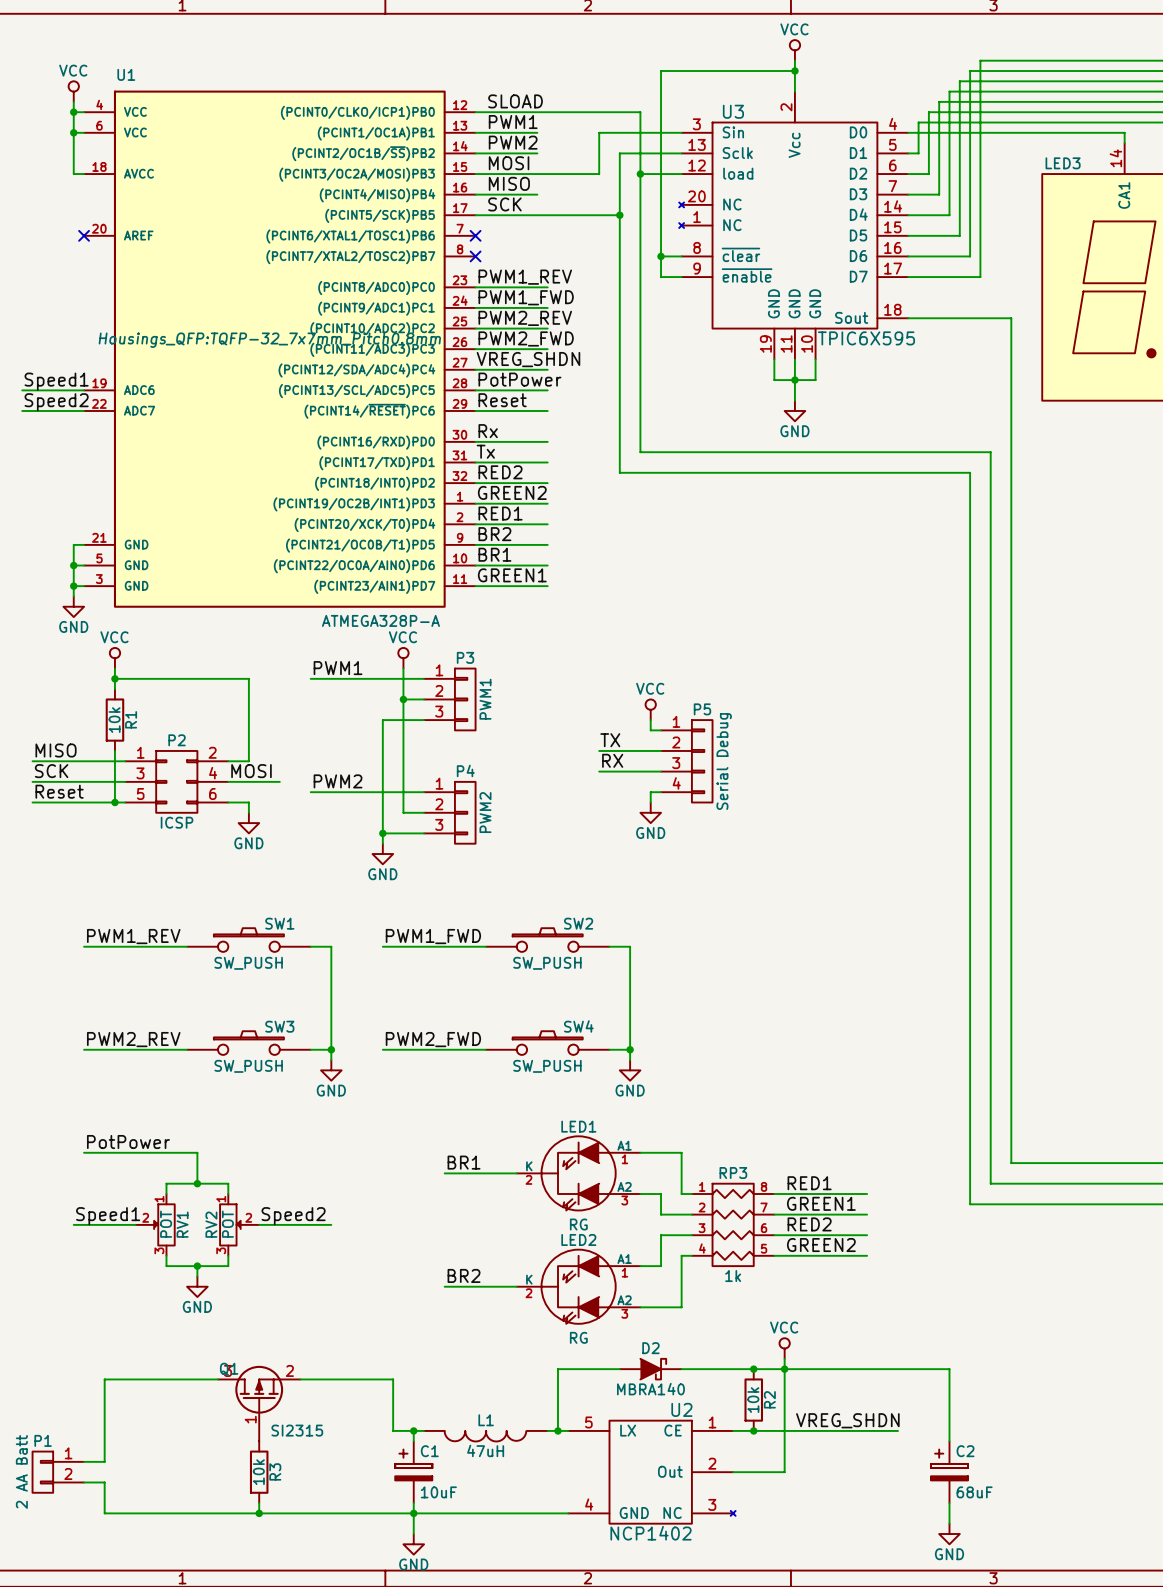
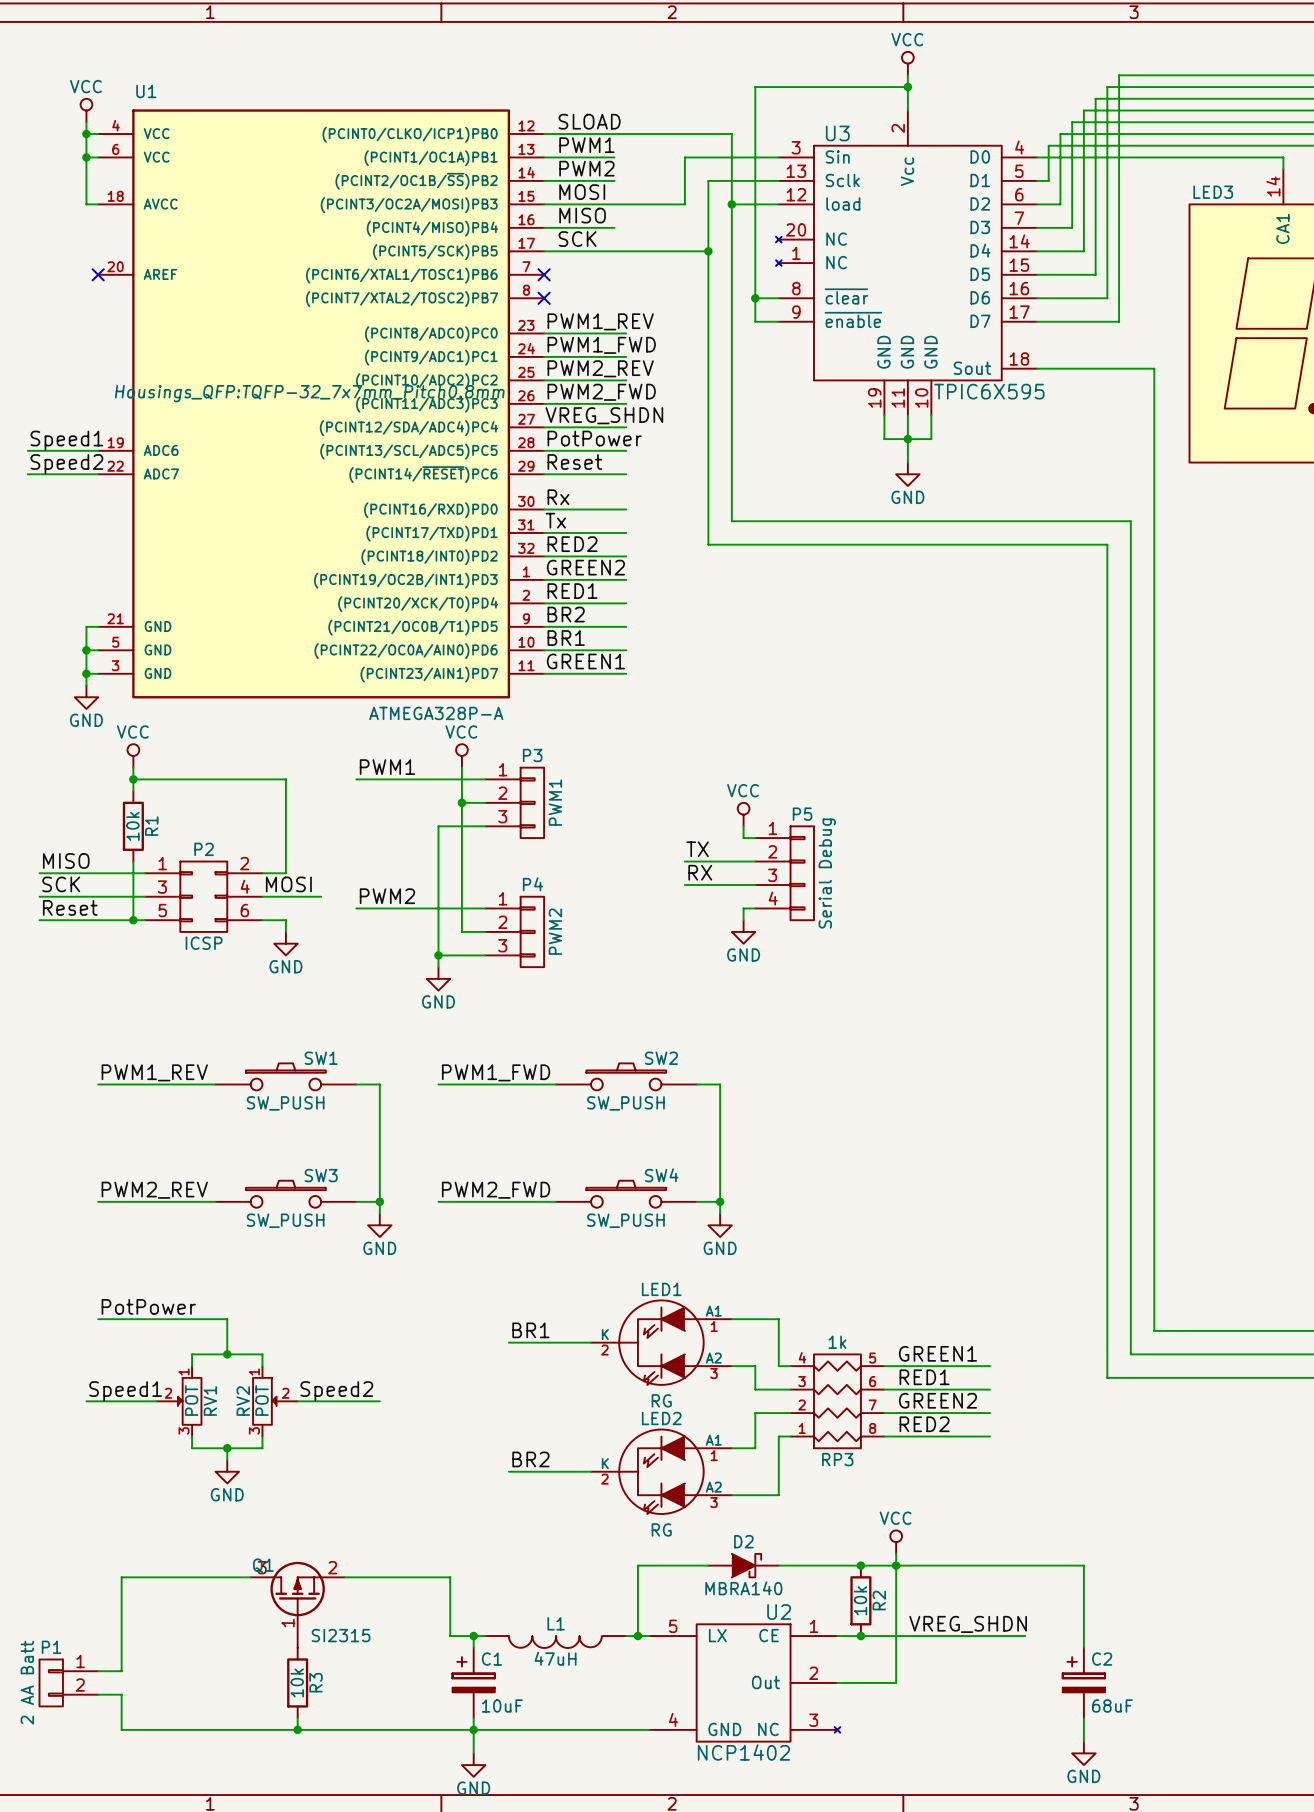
label: RED1 (809, 1183) -> GREEN1 (937, 1353)
label: GREEN1 (821, 1203) -> RED1 (924, 1377)
RP3 flip: as is (733, 1224) -> up-down (837, 1401)
label: RED2 (809, 1224) -> GREEN2 (937, 1400)
label: GREEN2 (821, 1245) -> RED2 (924, 1424)

